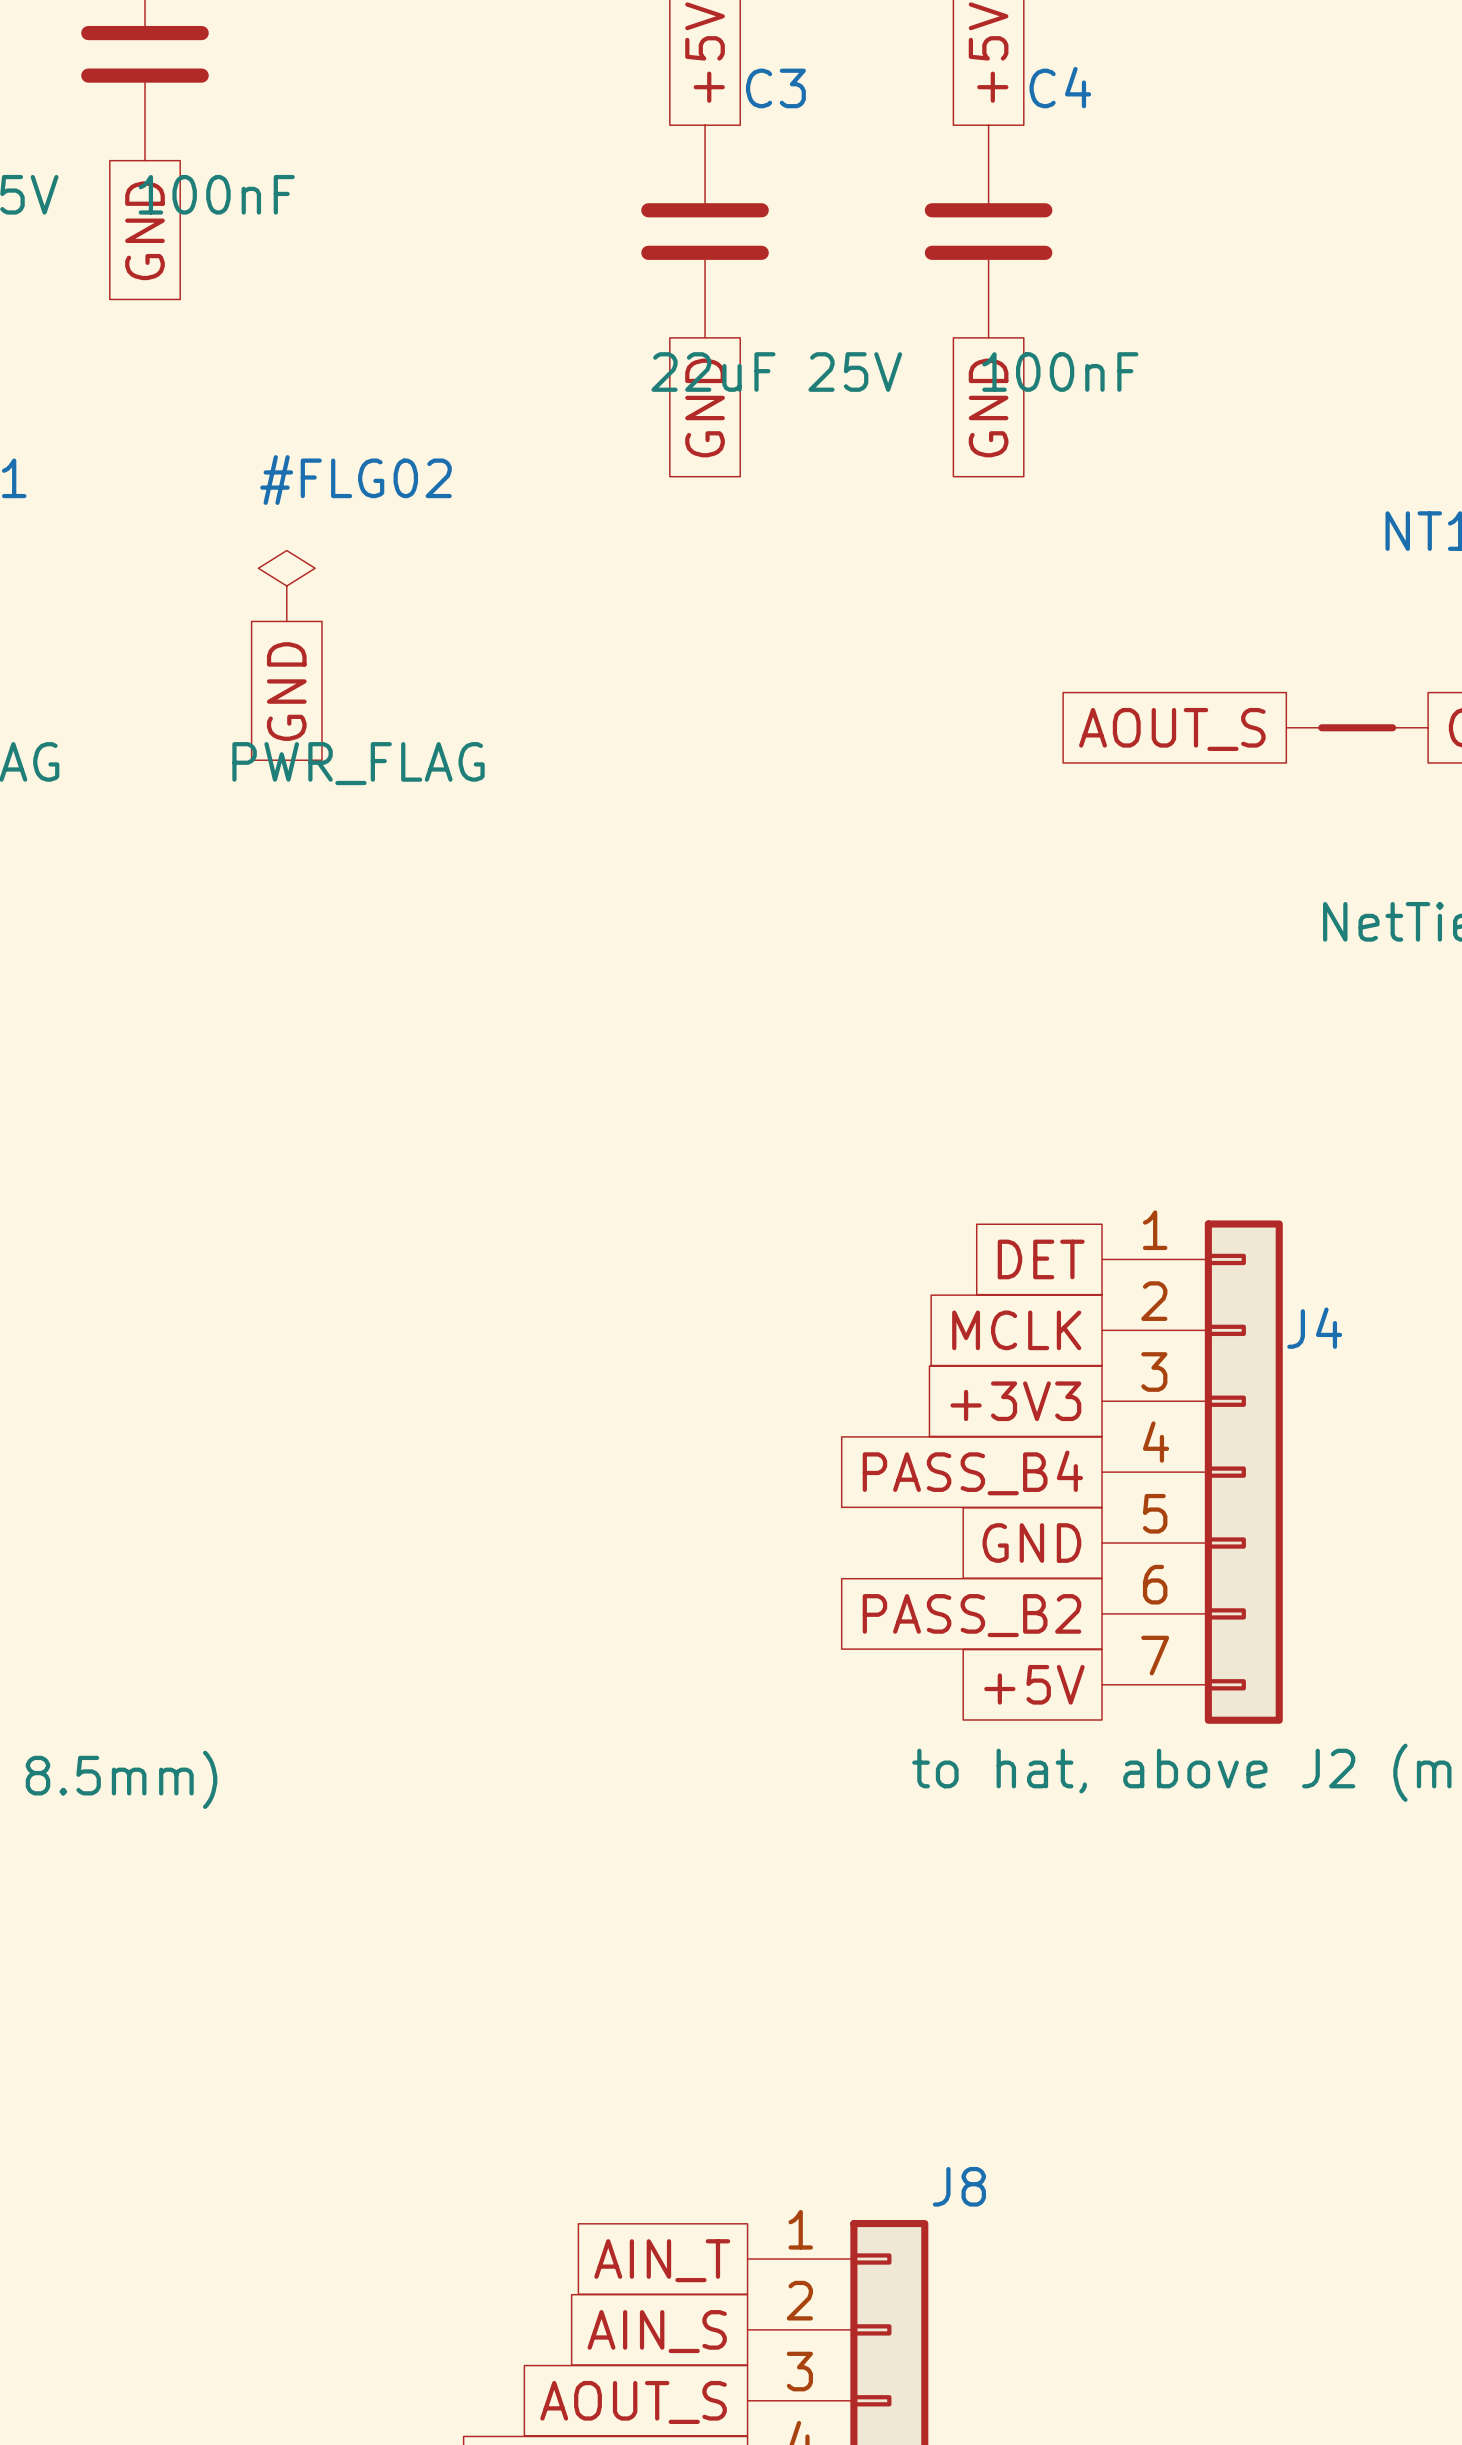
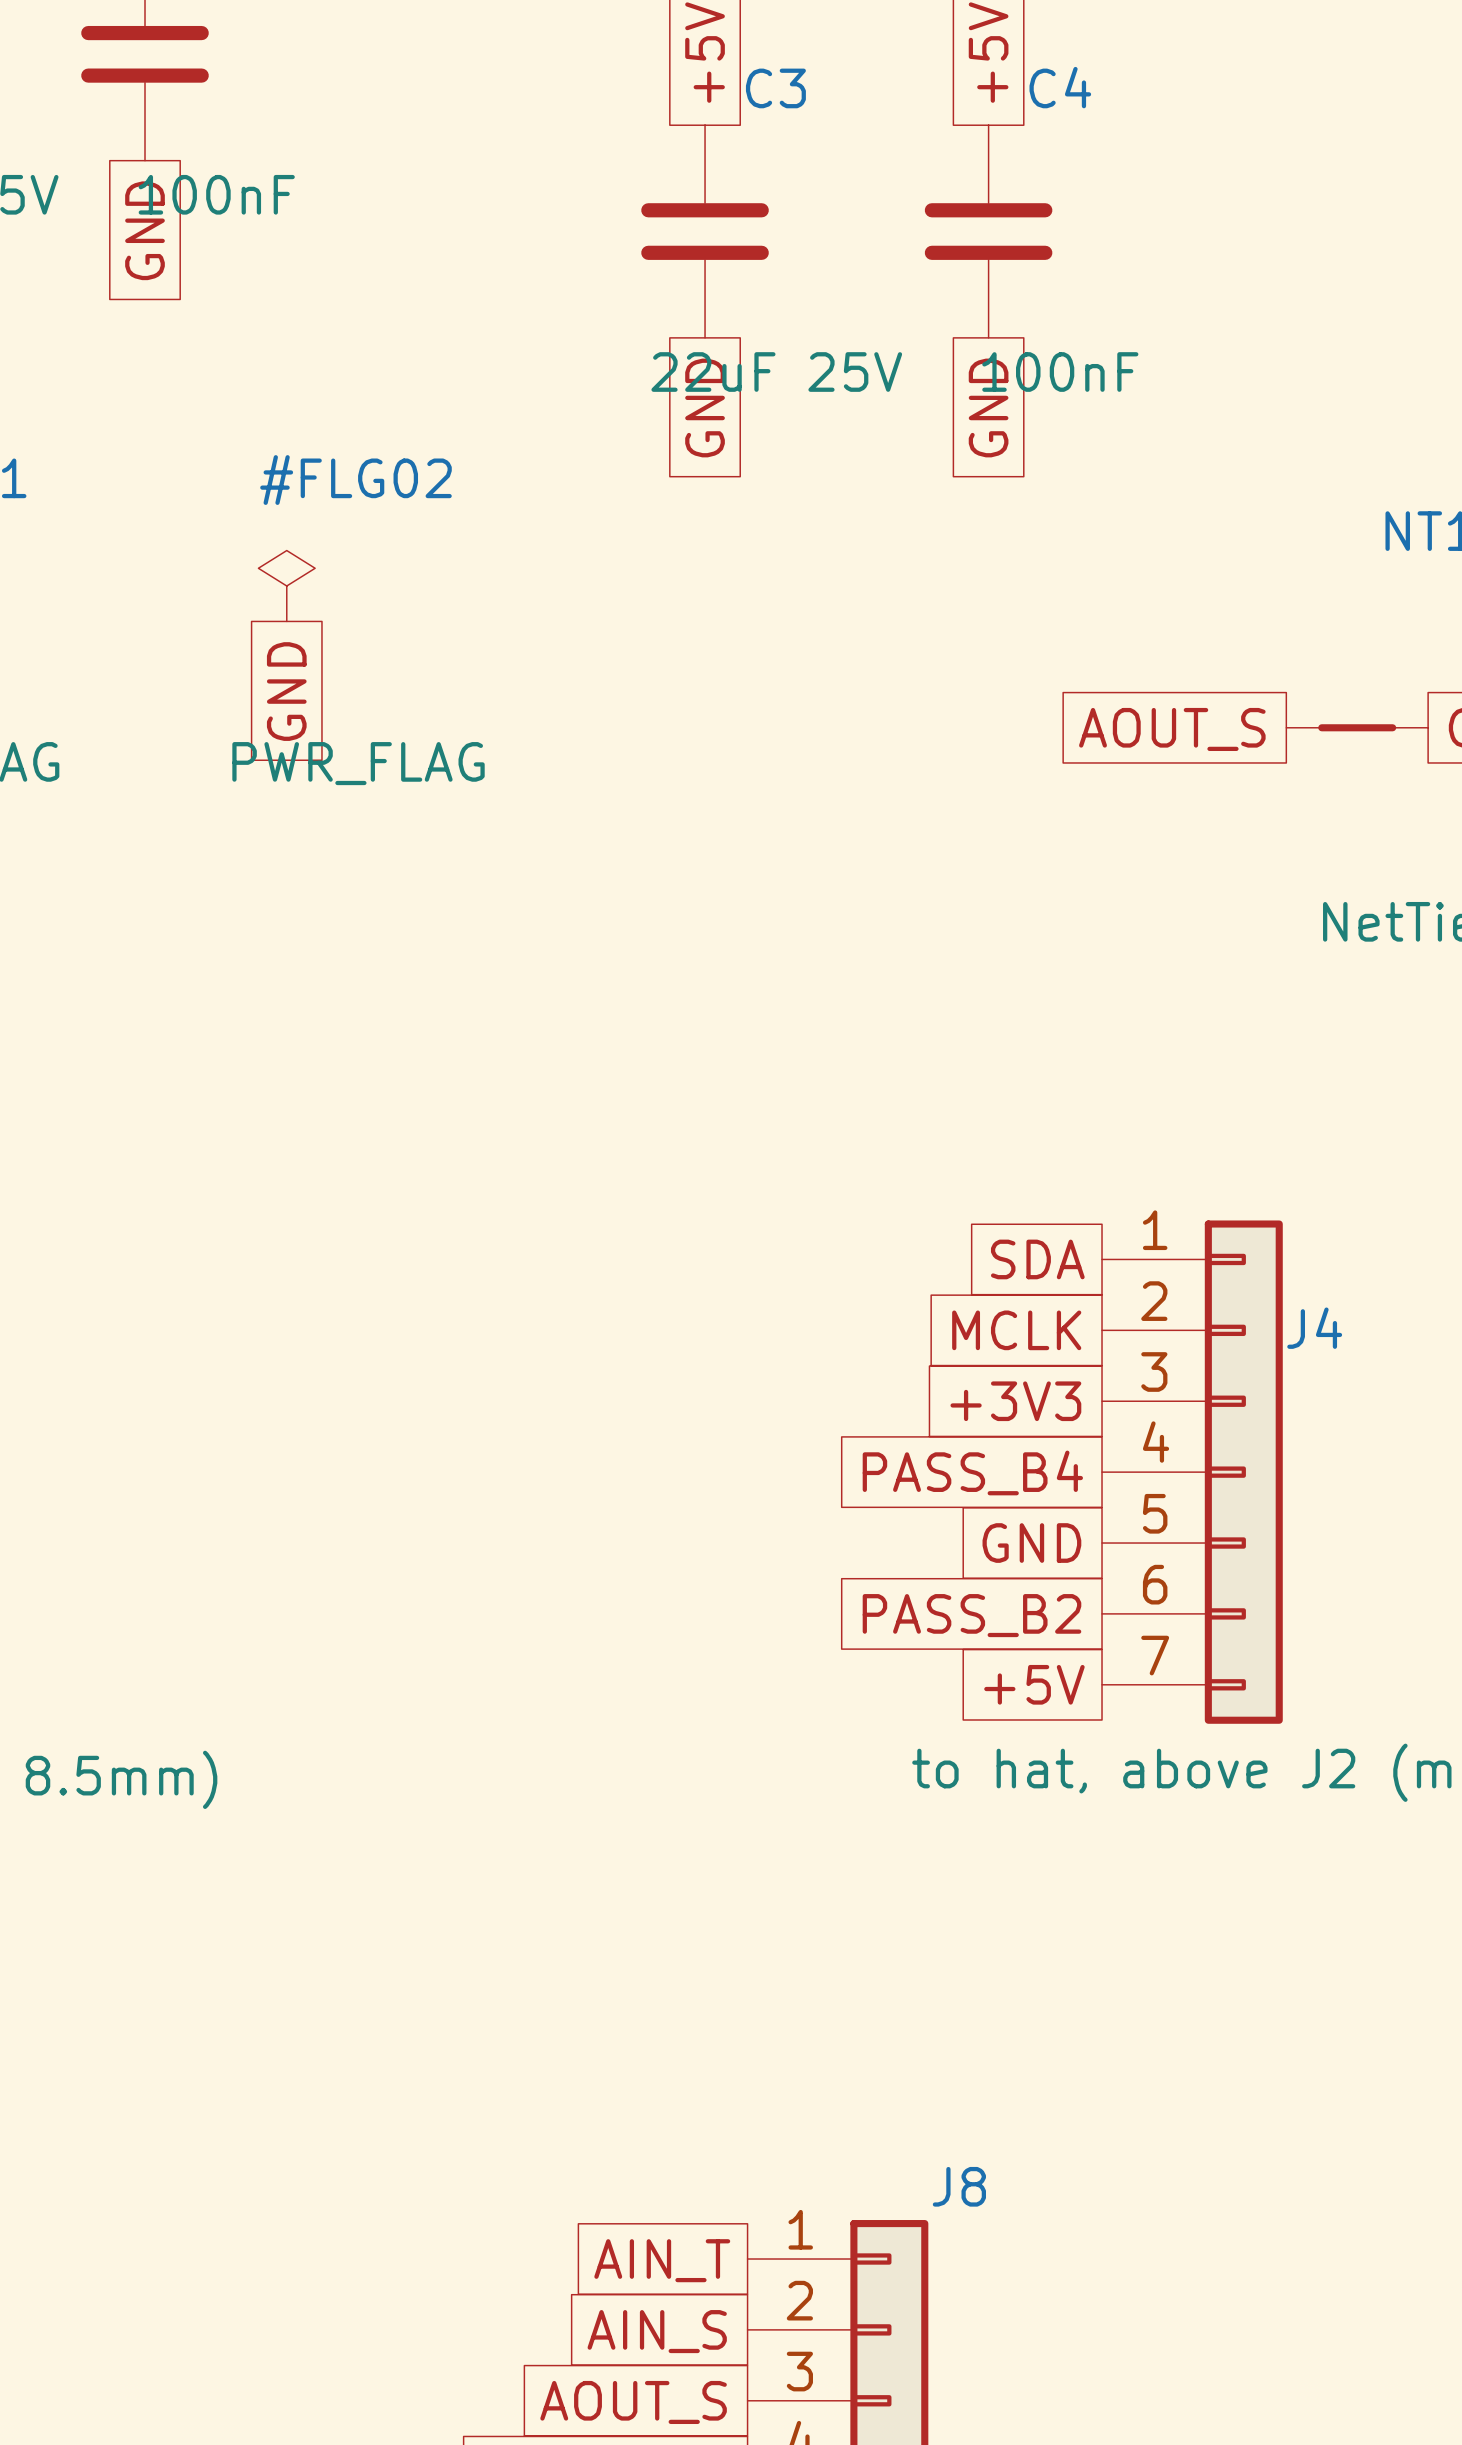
global label: DET (1041, 1259) -> SDA (1037, 1259)

